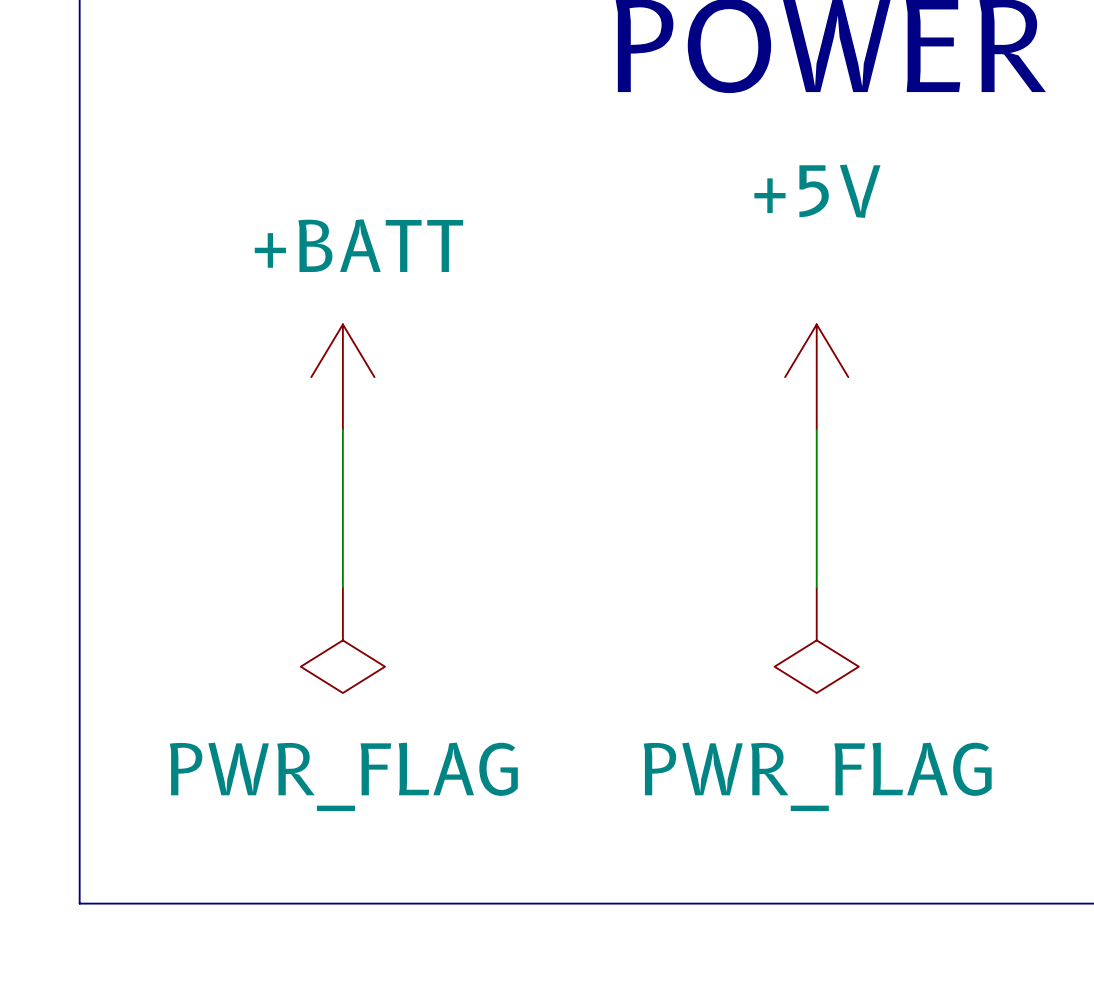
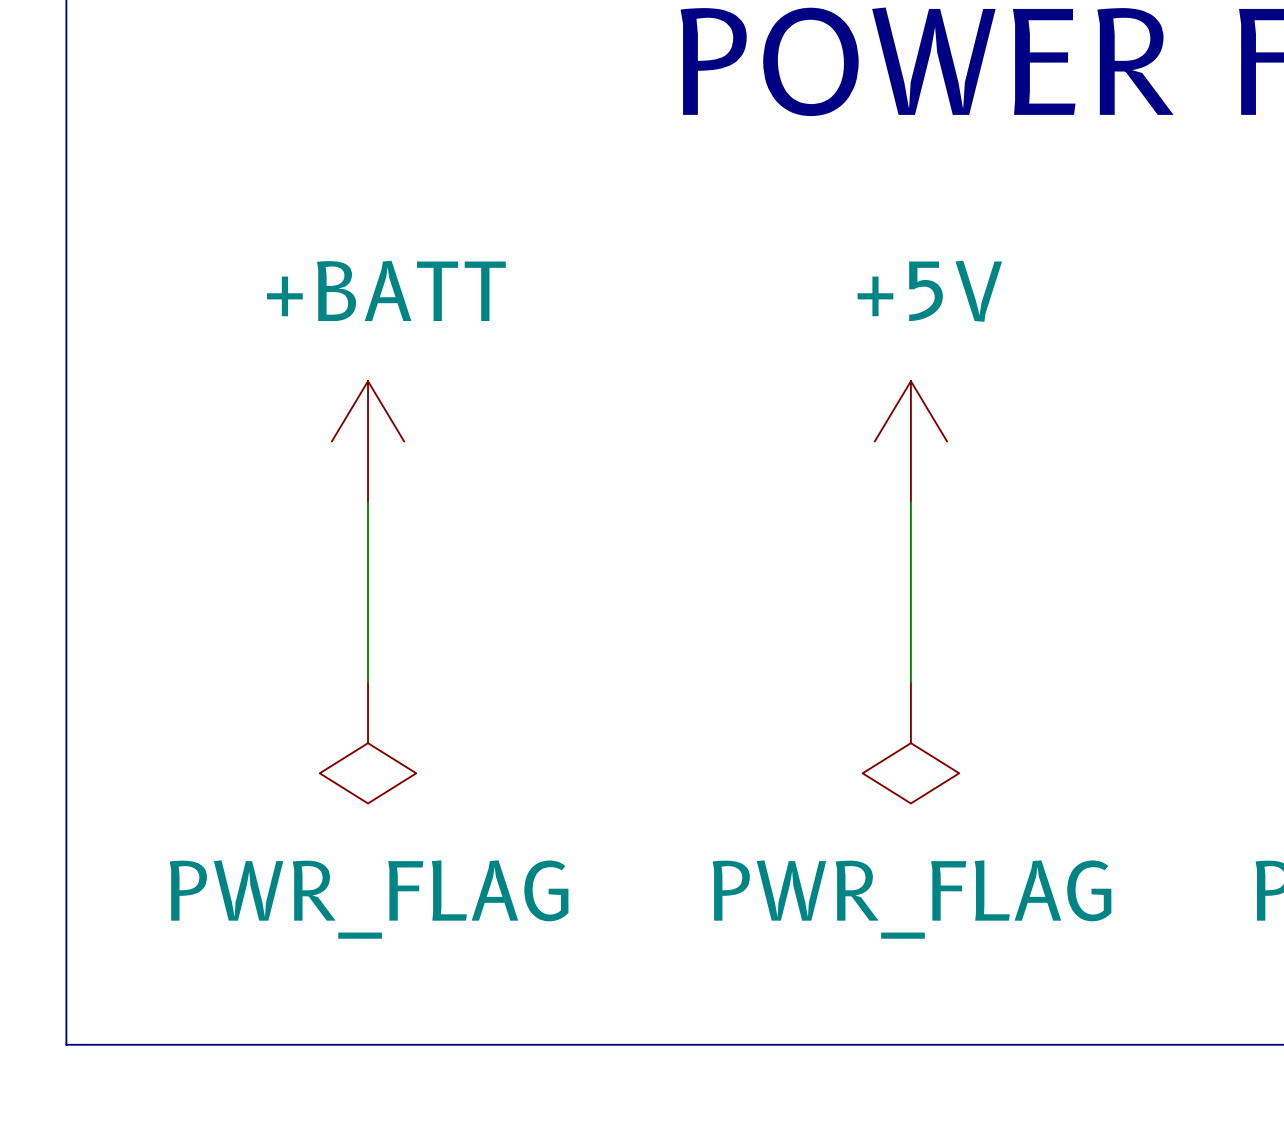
power symbol text position: +5V (817, 191) -> +5V (929, 291)

